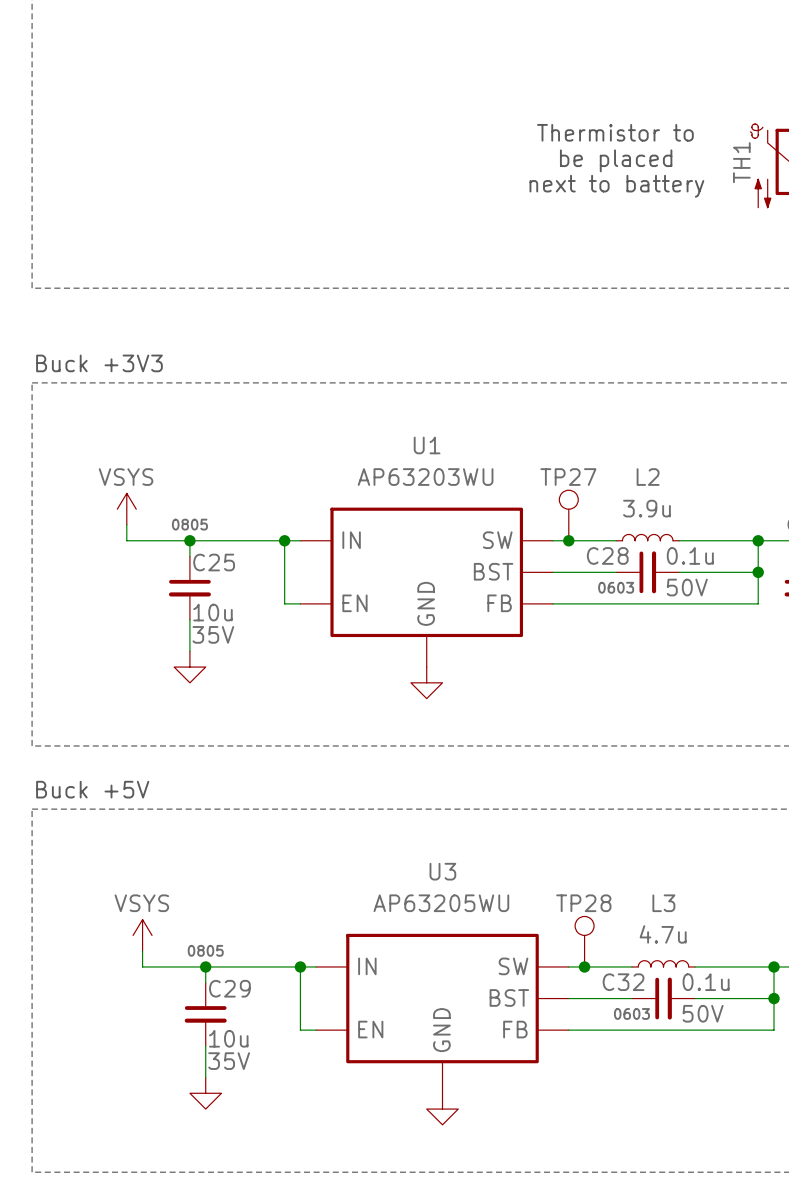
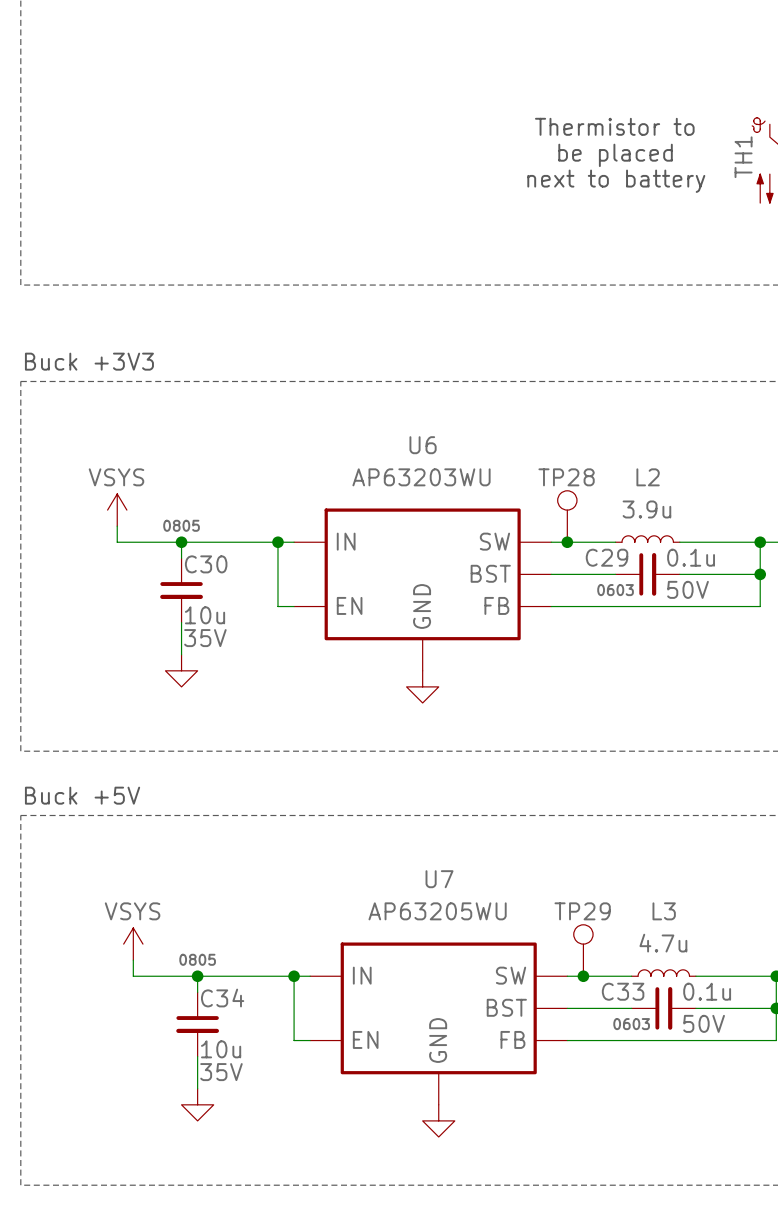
U1 name: U1 (427, 445) -> U6 (423, 445)
TP27 name: TP27 (568, 477) -> TP28 (566, 477)
C28 name: C28 (607, 555) -> C29 (607, 557)
C25 name: C25 (214, 562) -> C30 (206, 564)
U3 name: U3 (442, 871) -> U7 (439, 879)
TP28 name: TP28 (583, 903) -> TP29 (582, 911)
C32 name: C32 (623, 982) -> C33 (623, 991)
C29 name: C29 (229, 988) -> C34 (222, 998)

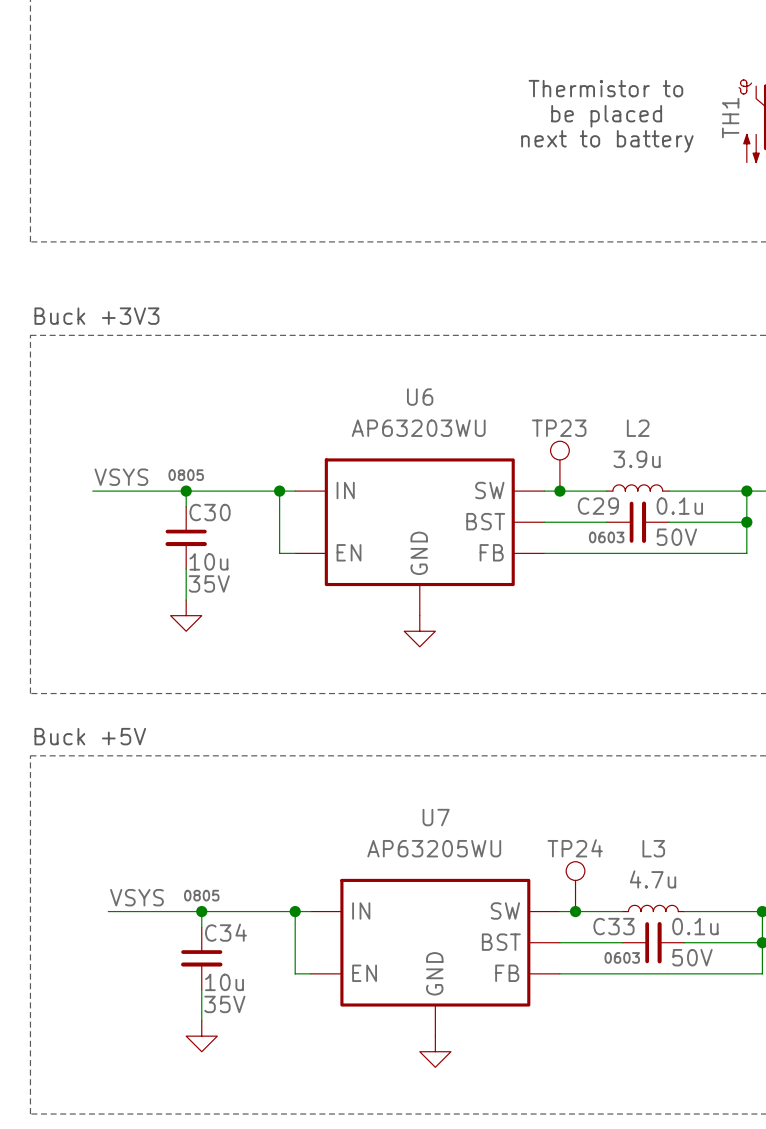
TP28 name: TP28 (566, 477) -> TP23 (559, 428)
power symbol: VSYS (117, 510) -> none
wire: (117, 526) (117, 542) -> (92, 491) (123, 491)
label: none -> VSYS (121, 477)
TP29 name: TP29 (582, 911) -> TP24 (575, 848)
power symbol: VSYS (133, 944) -> none
wire: (133, 960) (133, 976) -> (108, 911) (139, 911)
label: none -> VSYS (136, 897)

